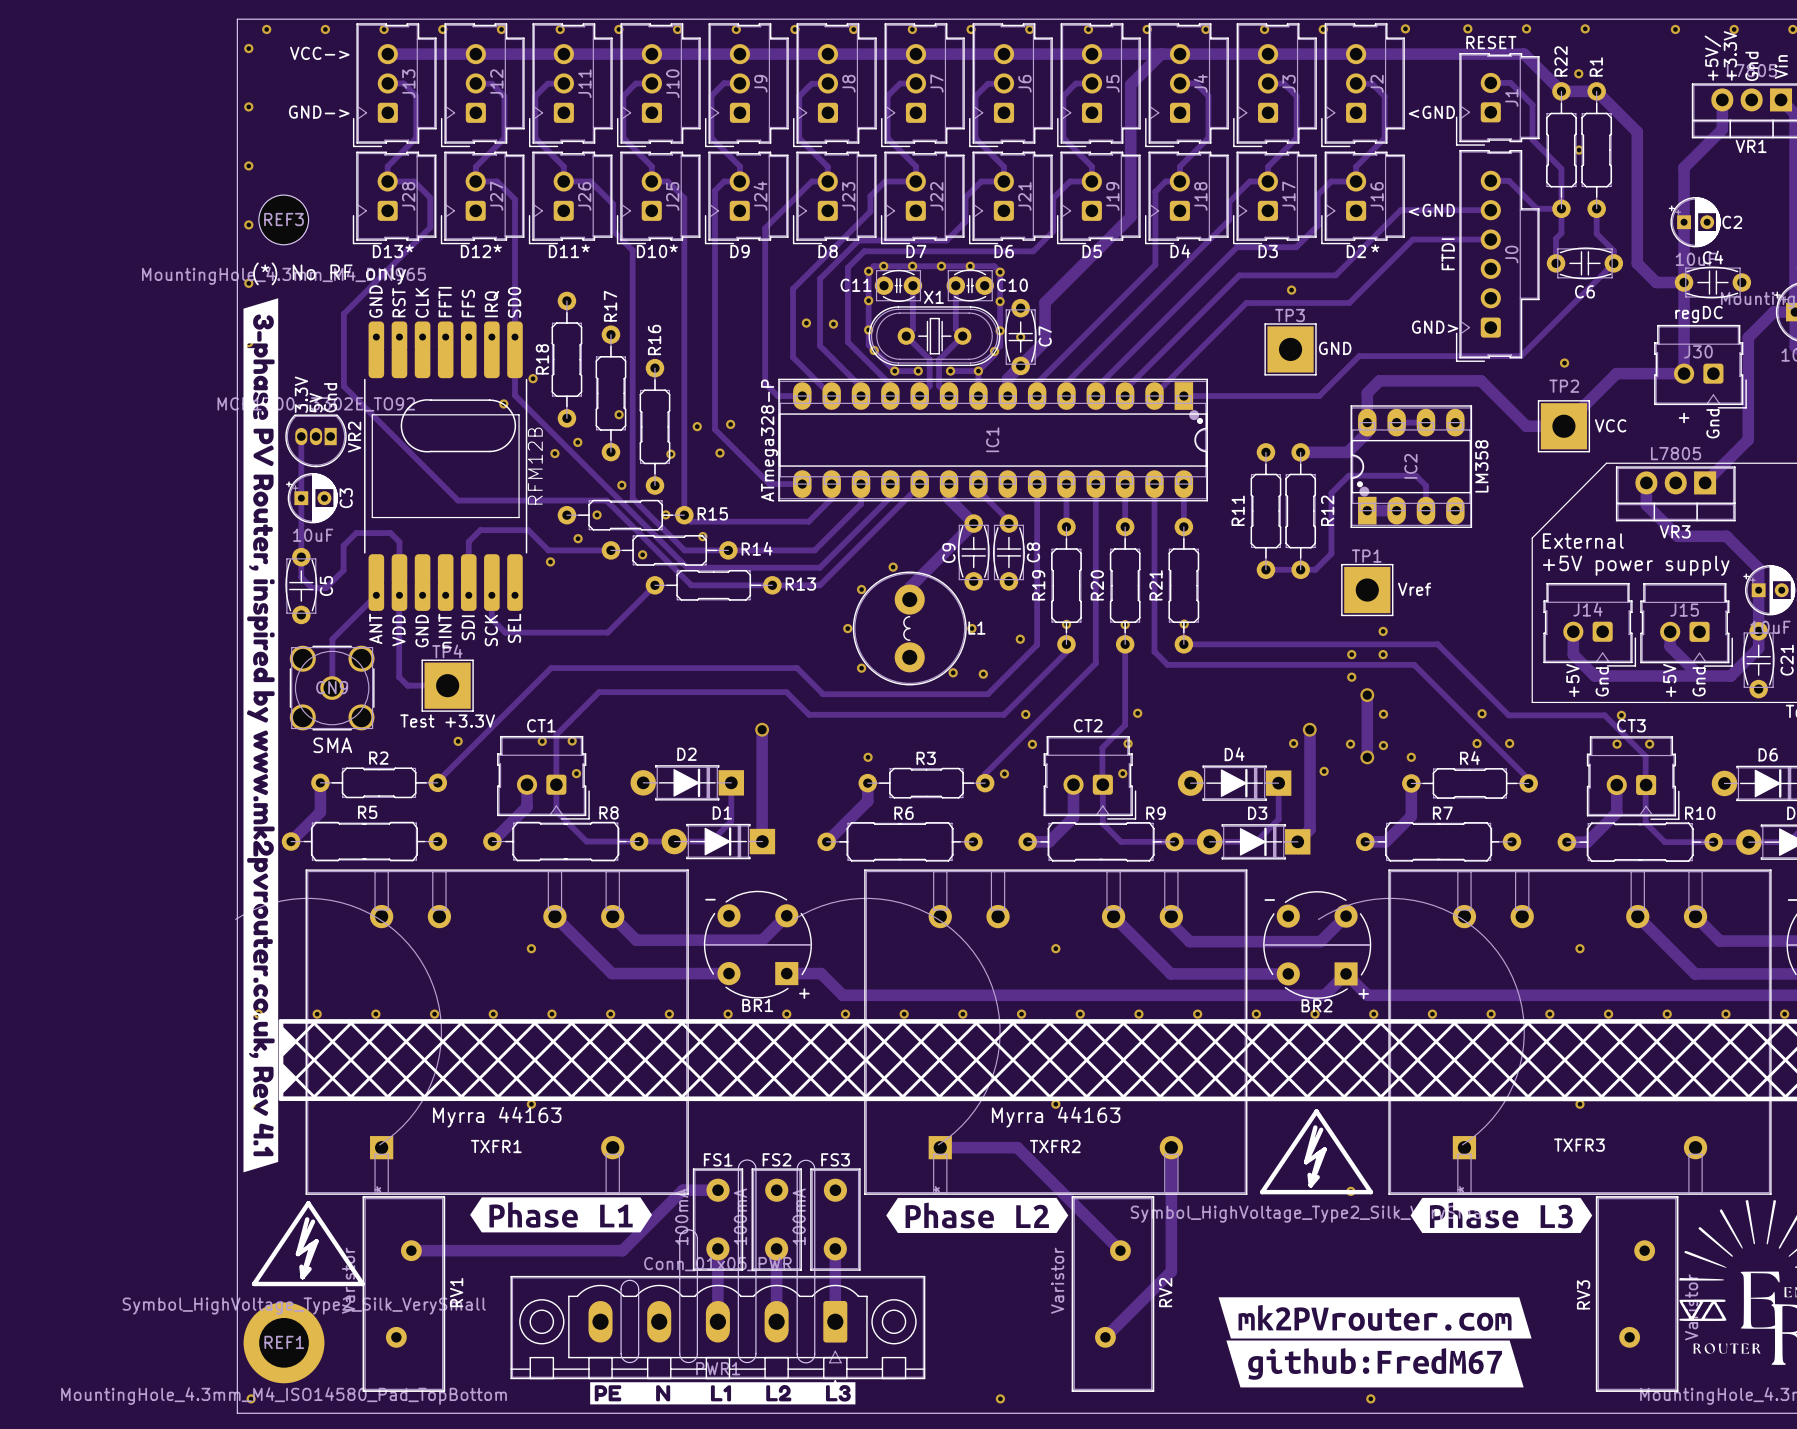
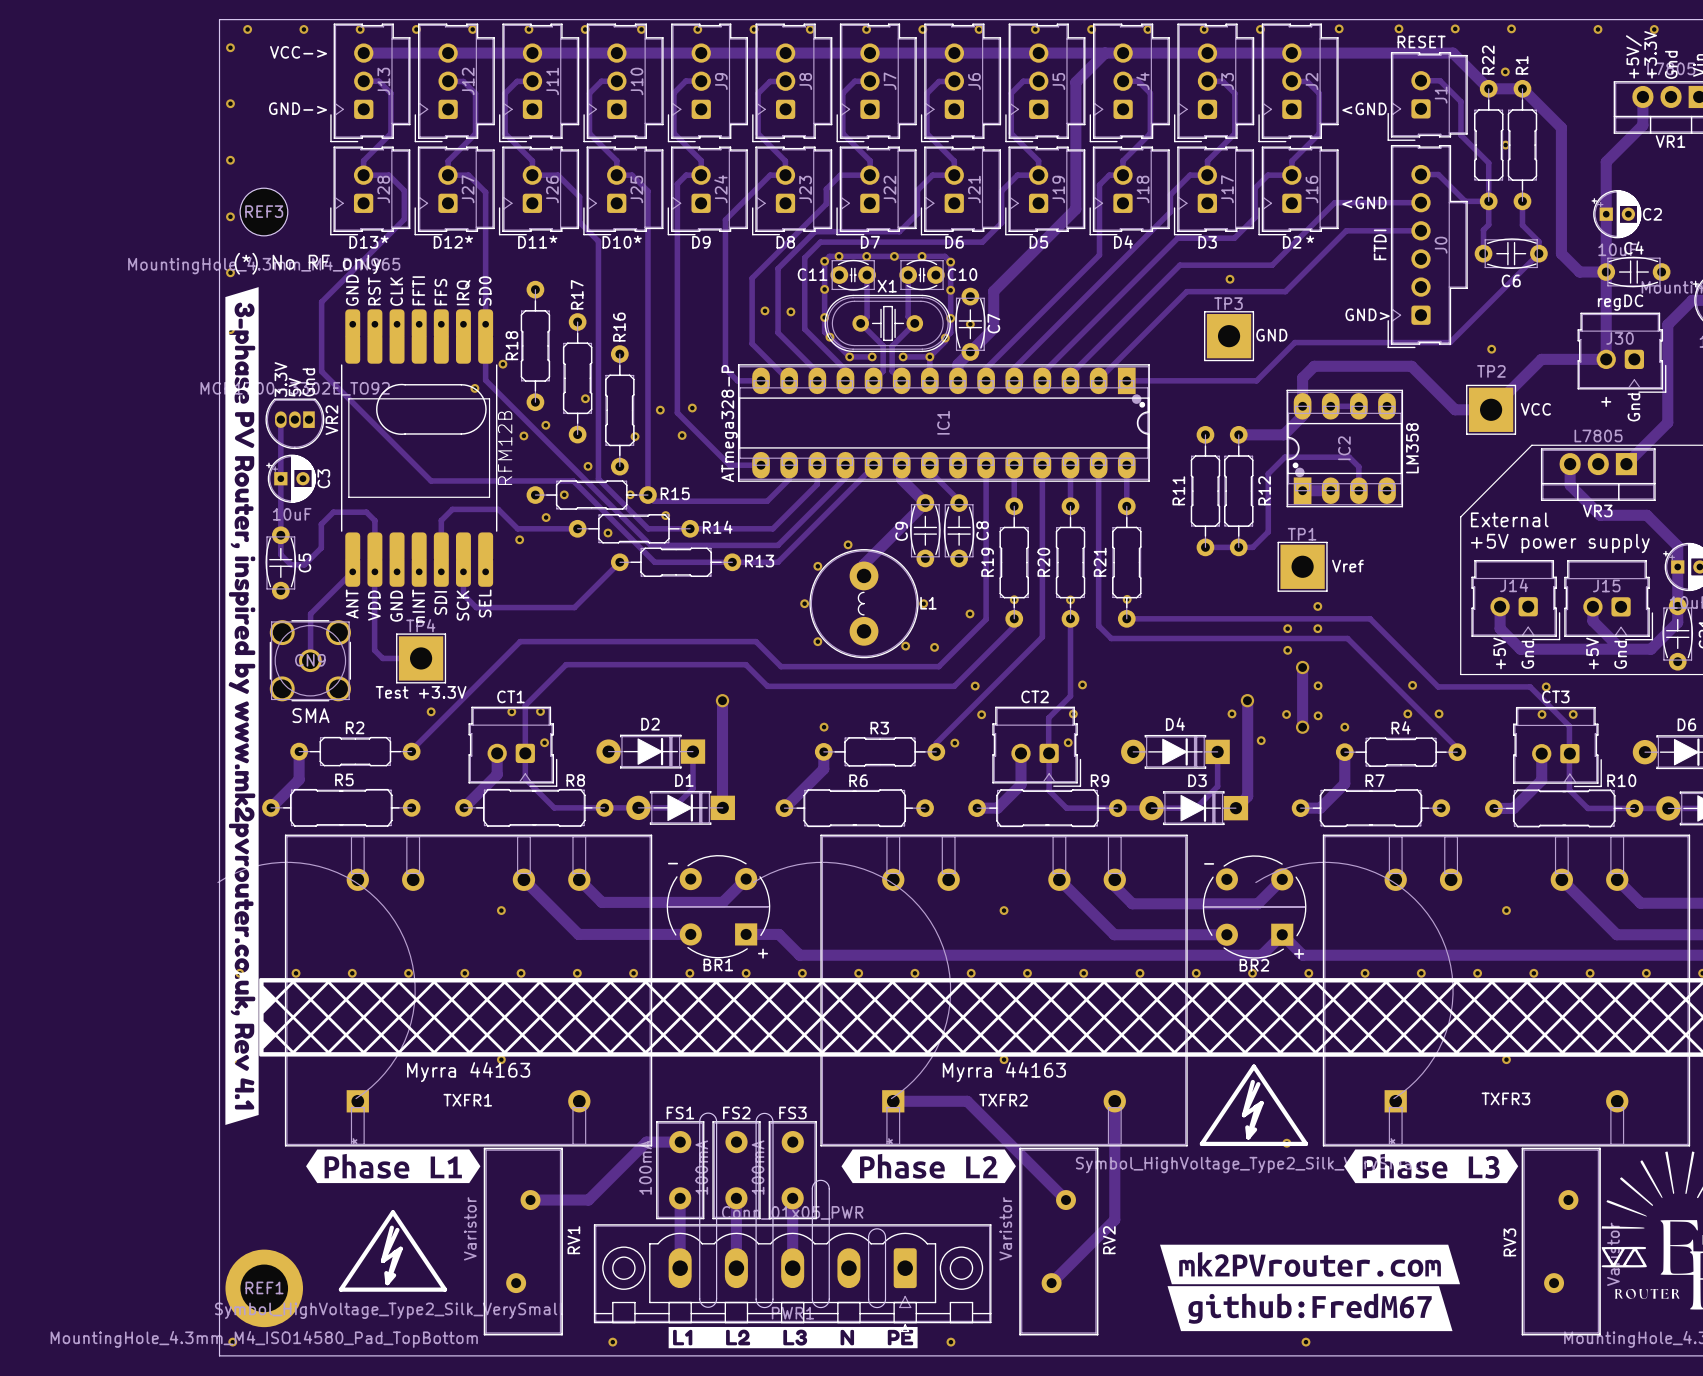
drawing position: (561, 1214) -> (393, 1166)
board edge: (679, 1238) (679, 1354) (682, 1360) (689, 1362) (694, 1360) (697, 1354) (697, 1237) (693, 1231) (687, 1229) (682, 1232) (679, 1238) -> none
board edge: none -> (812, 1188) (812, 1300) (815, 1305) (821, 1307) (826, 1305) (829, 1300) (829, 1187) (825, 1181) (819, 1180) (814, 1183) (812, 1188)
drawing position: (308, 1243) -> (392, 1250)
track: (411, 1250) (561, 1250) -> none
board edge: (621, 1289) (621, 1354) (624, 1360) (630, 1362) (636, 1359) (638, 1354) (638, 1288) (635, 1282) (629, 1280) (624, 1282) (621, 1289) -> none
board edge: none -> (868, 1237) (868, 1300) (872, 1306) (878, 1307) (883, 1304) (885, 1300) (885, 1236) (883, 1231) (877, 1228) (871, 1231) (868, 1237)
RV1 position: (403, 1294) -> (523, 1241)
PWR1 position: (717, 1332) -> (792, 1278)
drawing: [590, 1382, 856, 1405] -> none
drawing: none -> [668, 1326, 918, 1349]

